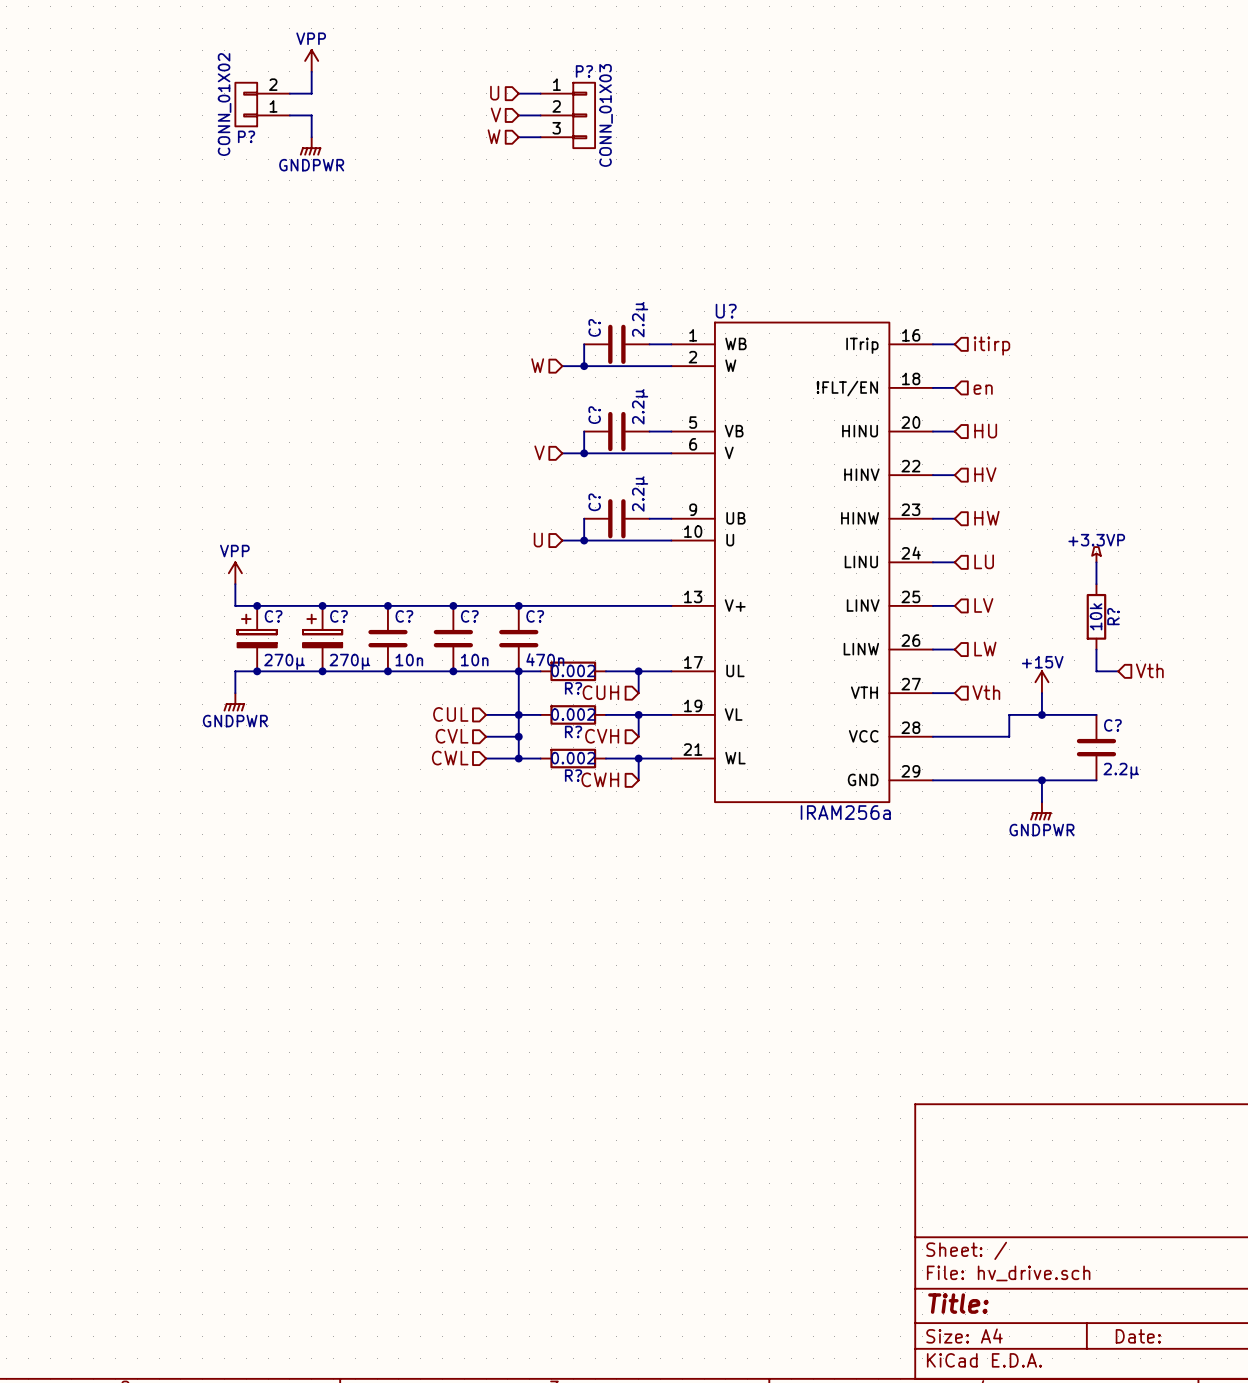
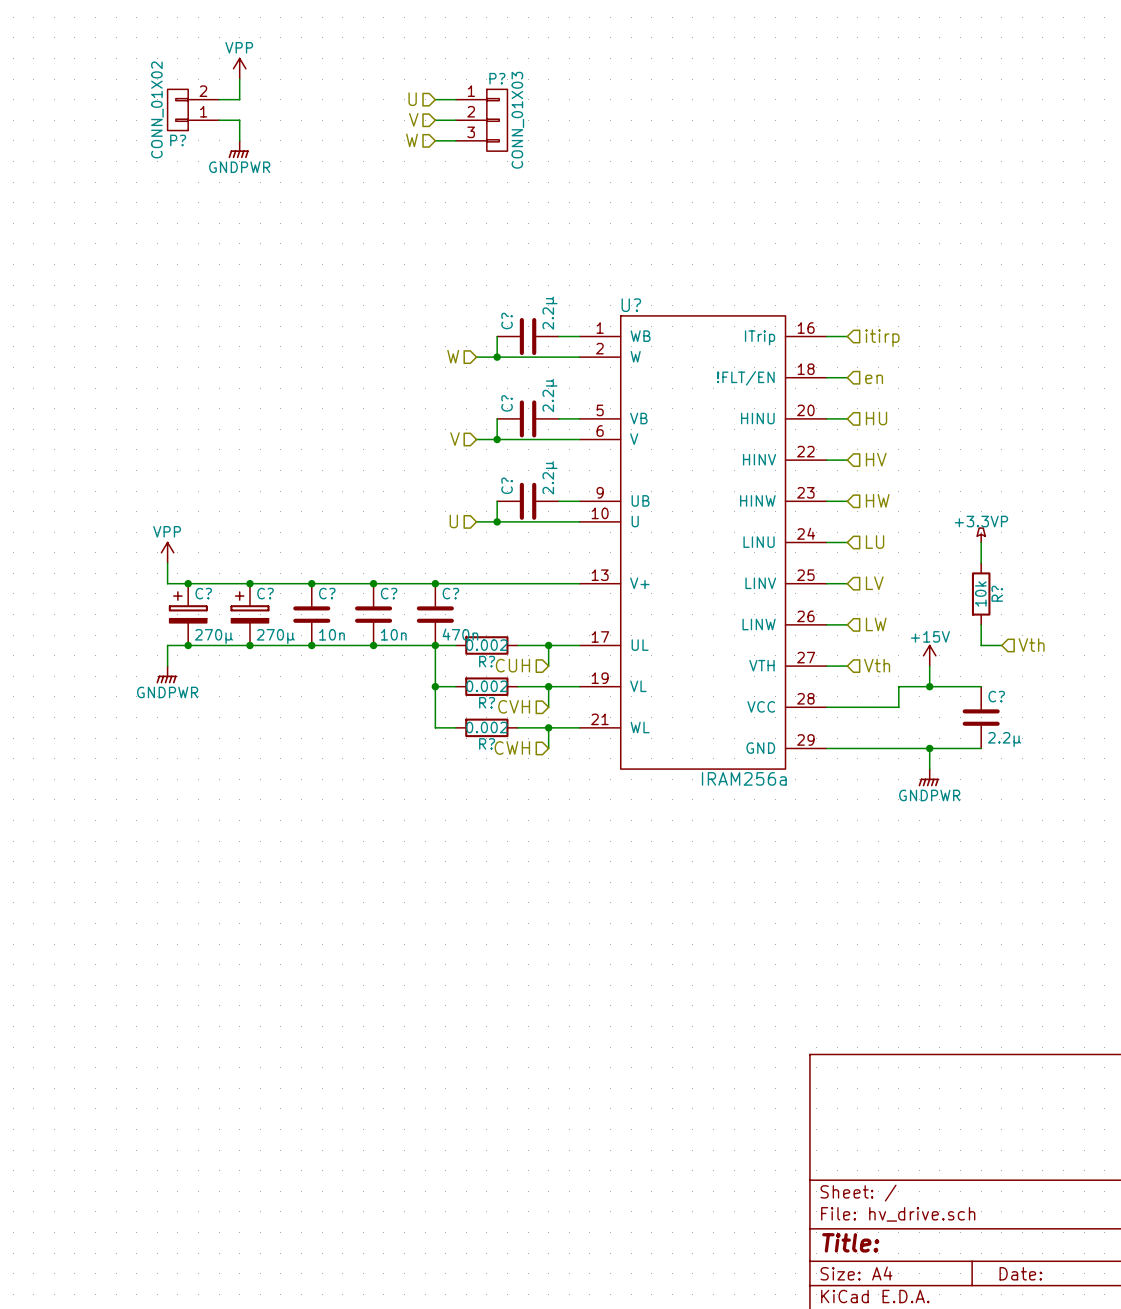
hierarchical label: CUL (450, 714) -> none
wire: (486, 714) (518, 714) -> none
hierarchical label: CVL (452, 736) -> none
wire: (486, 736) (518, 736) -> none
junction: (518, 736) -> none
hierarchical label: CWL (450, 758) -> none
wire: (486, 758) (518, 758) -> none
junction: (518, 758) -> none

